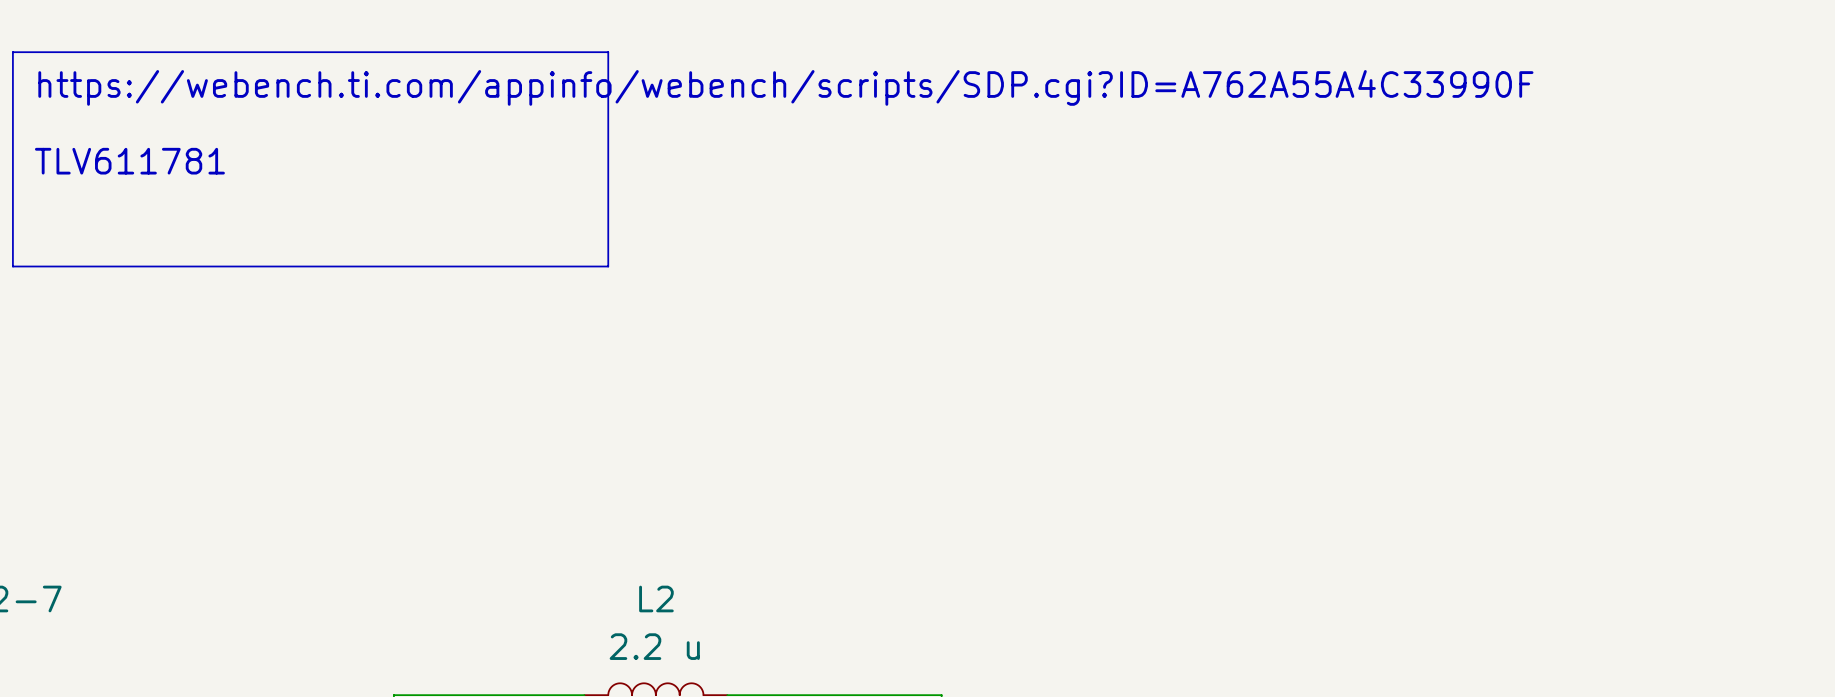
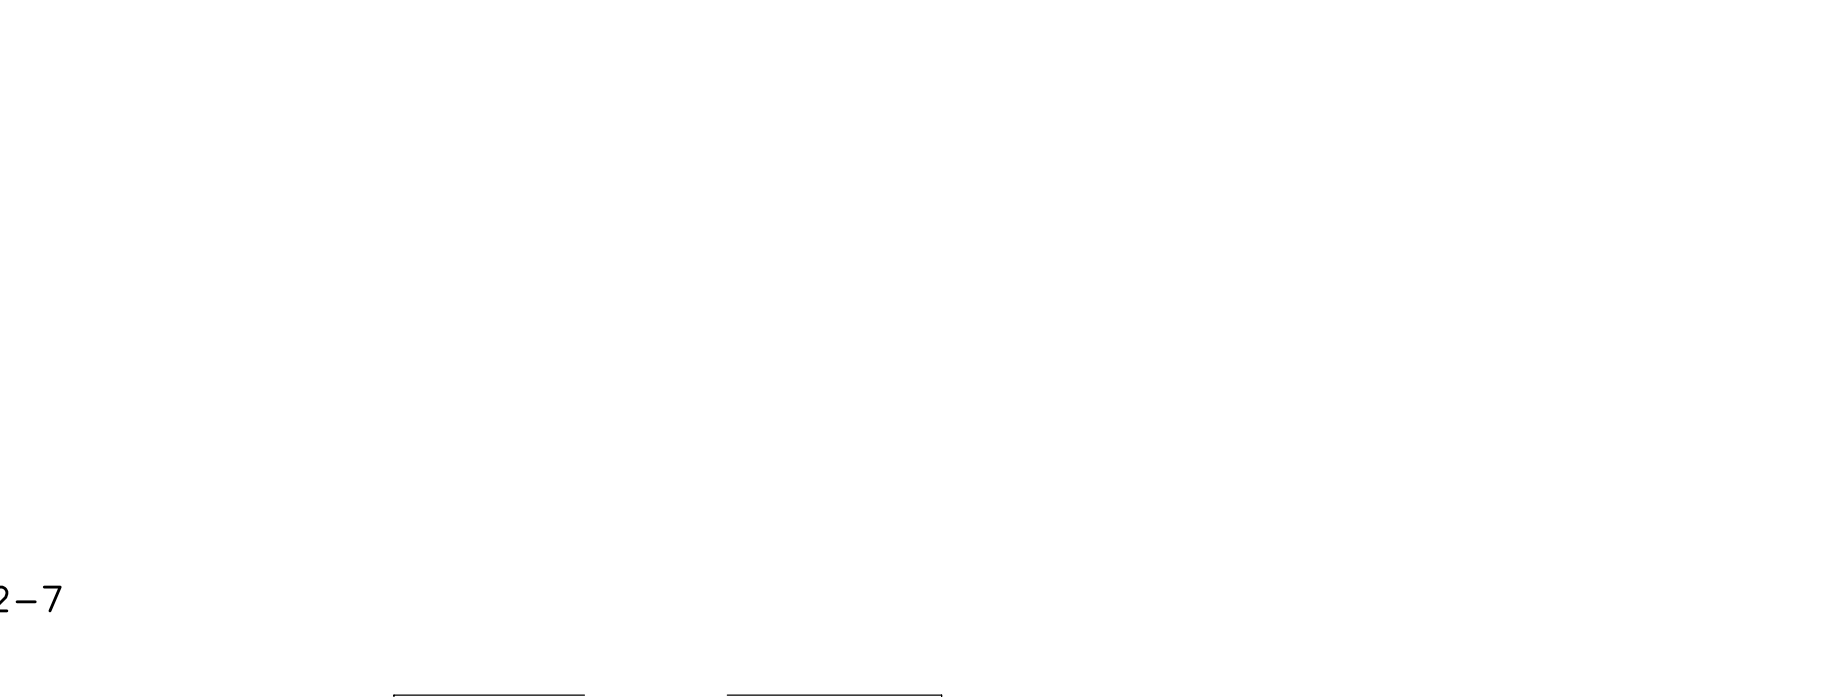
line: (12, 52) (608, 52) (608, 266) (12, 266) (12, 52) -> none
text: https://webench.ti.com/appinfo/webench/scripts/SDP.cgi?ID=A762A55A4C33990F (785, 87) -> none
text: TLV611781 (129, 161) -> none
L2: 2.2 u (655, 689) -> none

